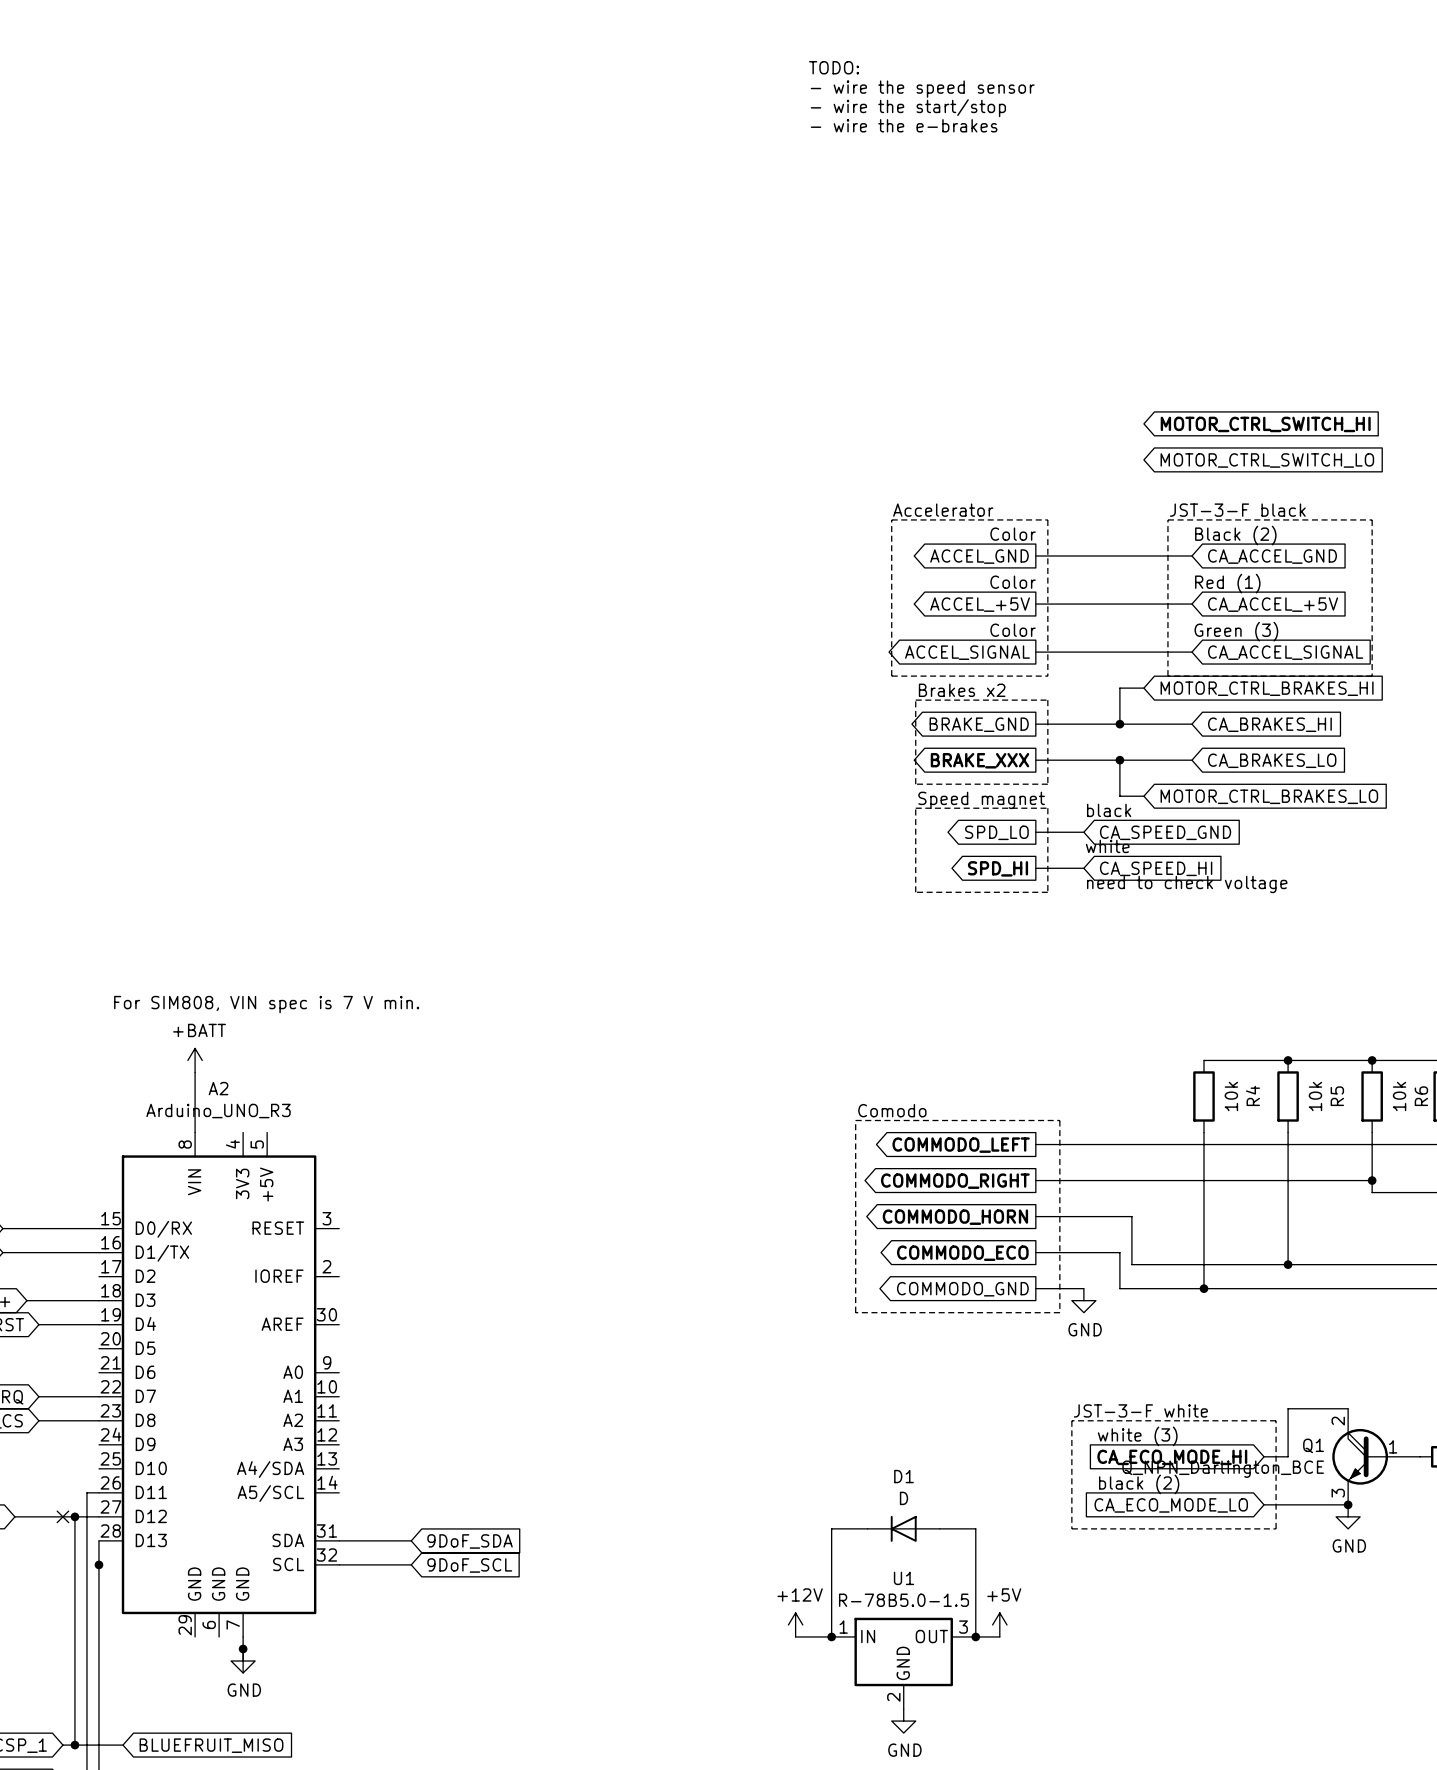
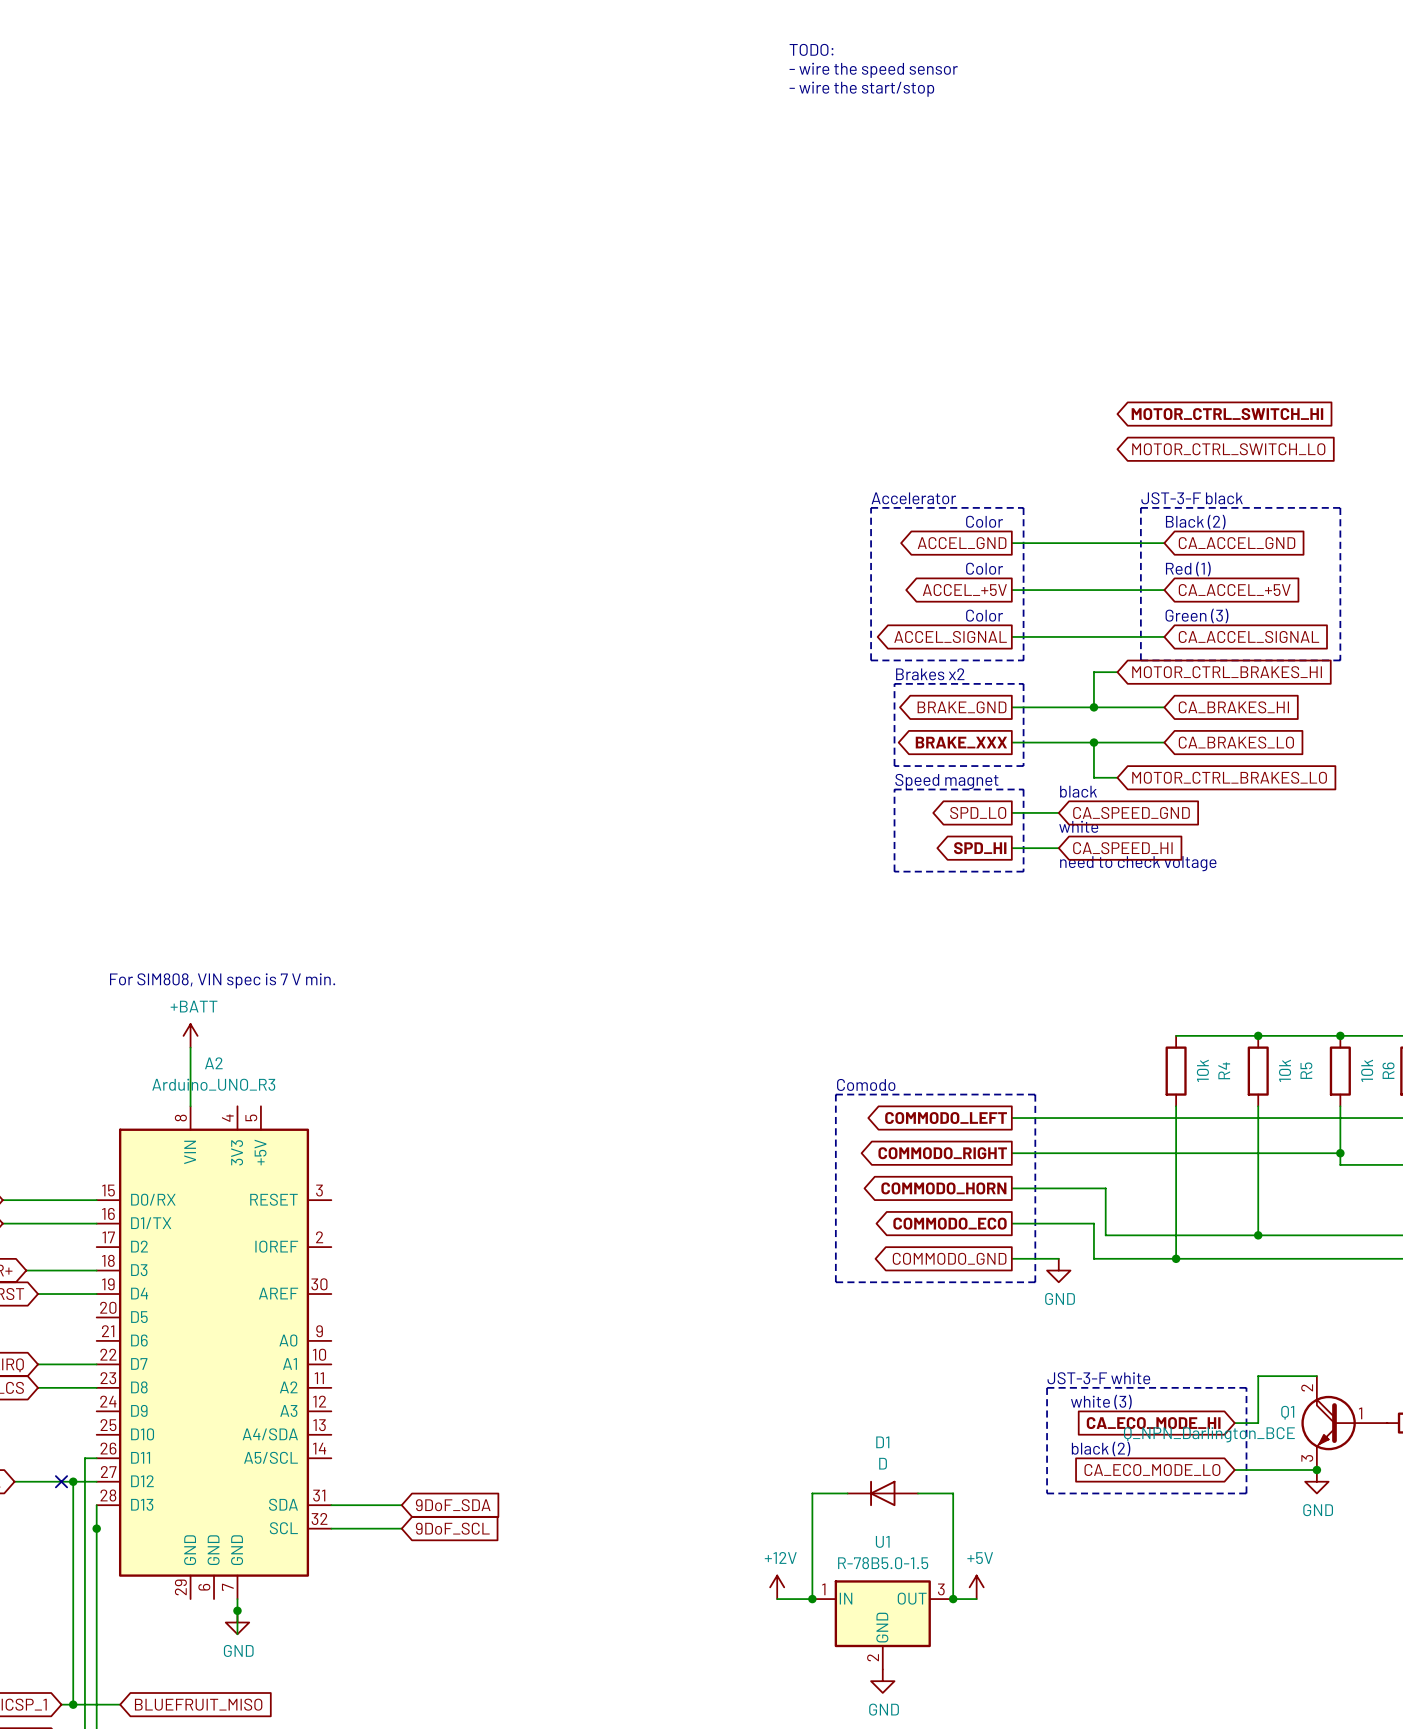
text: none -> TODO: (811, 49)
text: TODO: (834, 67) -> - wire the speed sensor (873, 70)
text: - wire the speed sensor (922, 89) -> - wire the start/stop (861, 89)
text: - wire the start/stop (908, 108) -> none
text: - wire the e-brakes (904, 125) -> none

